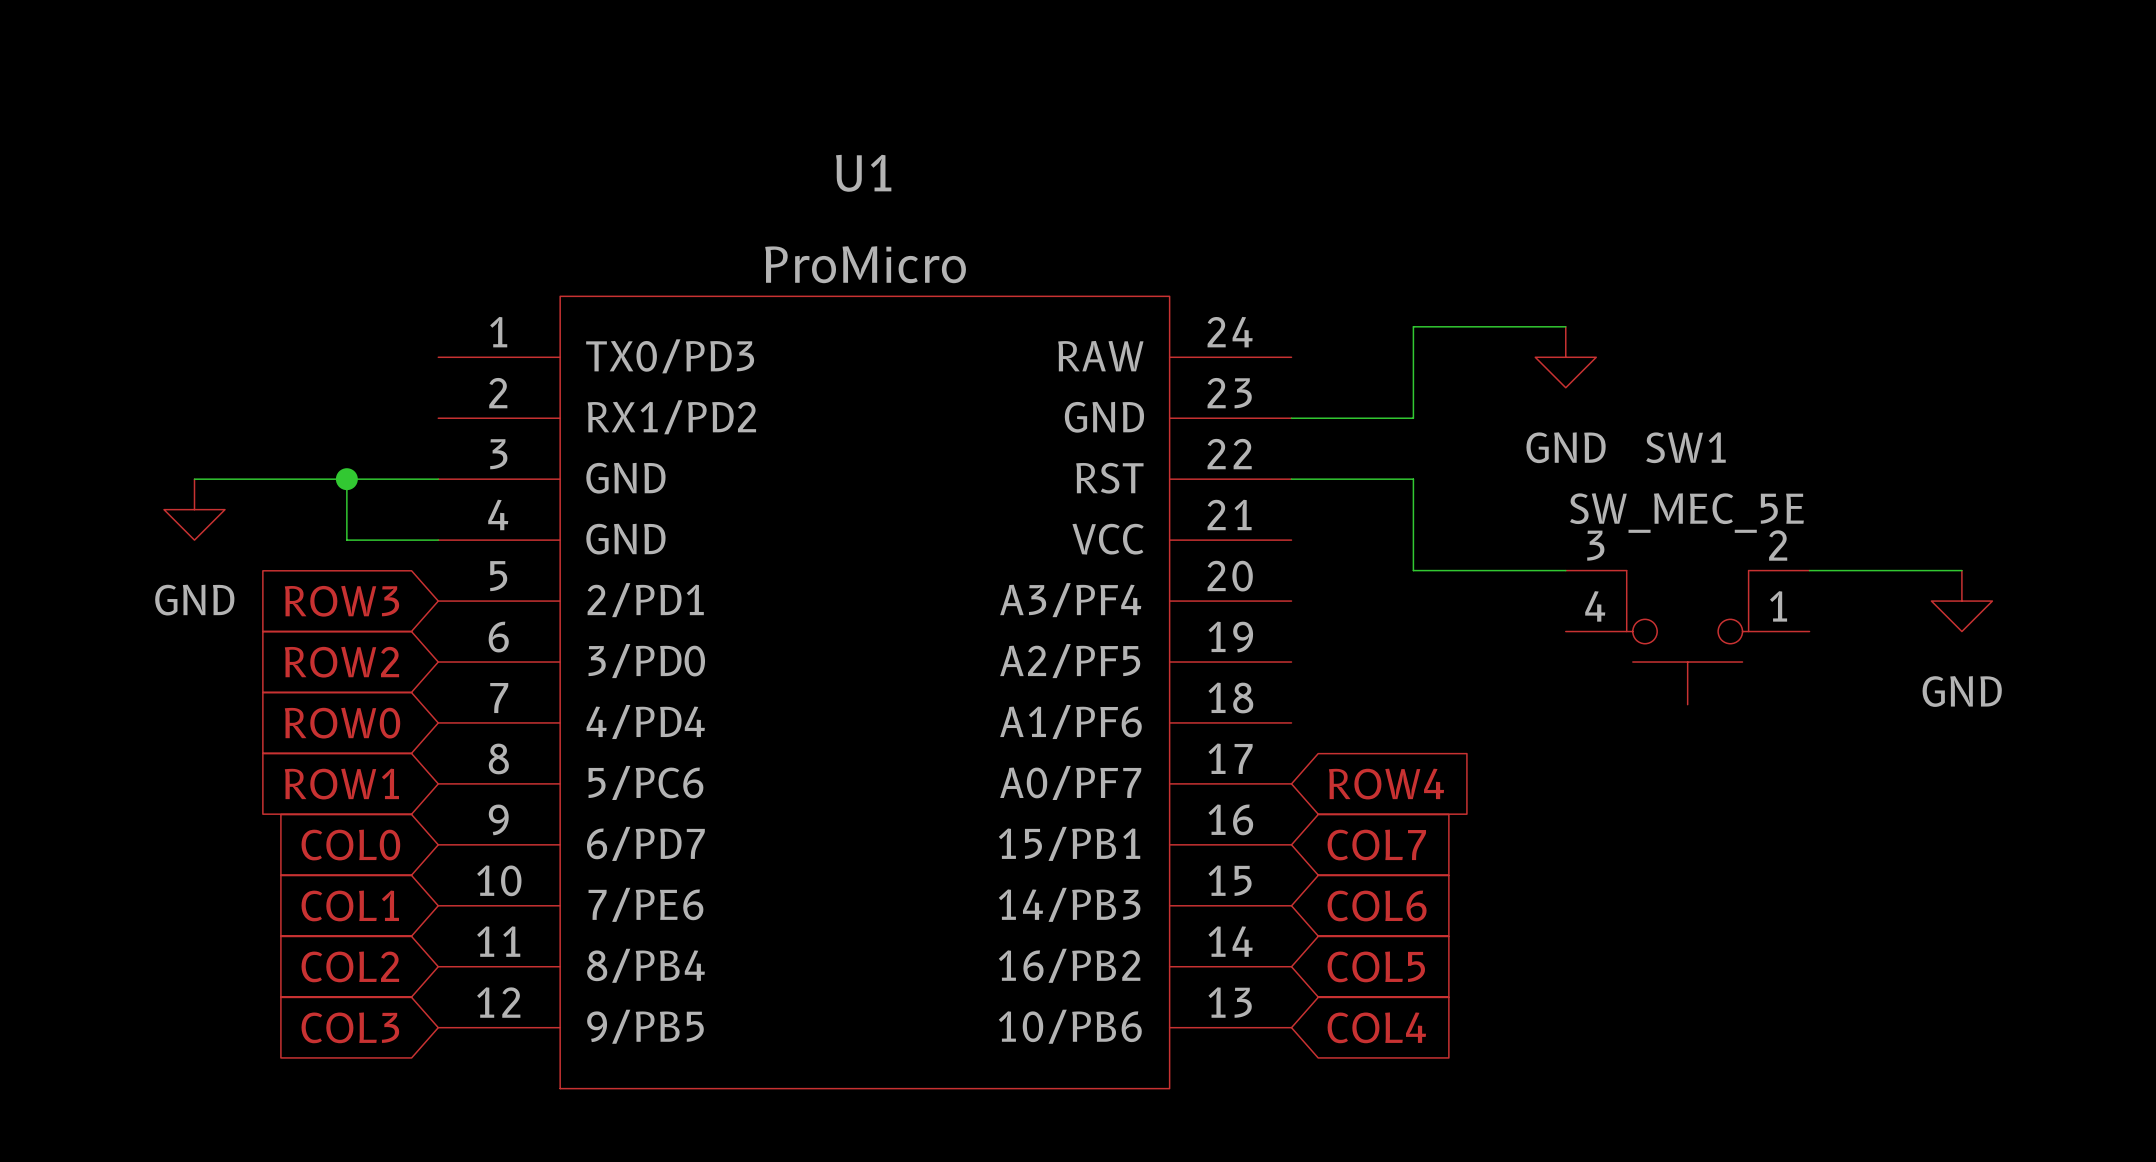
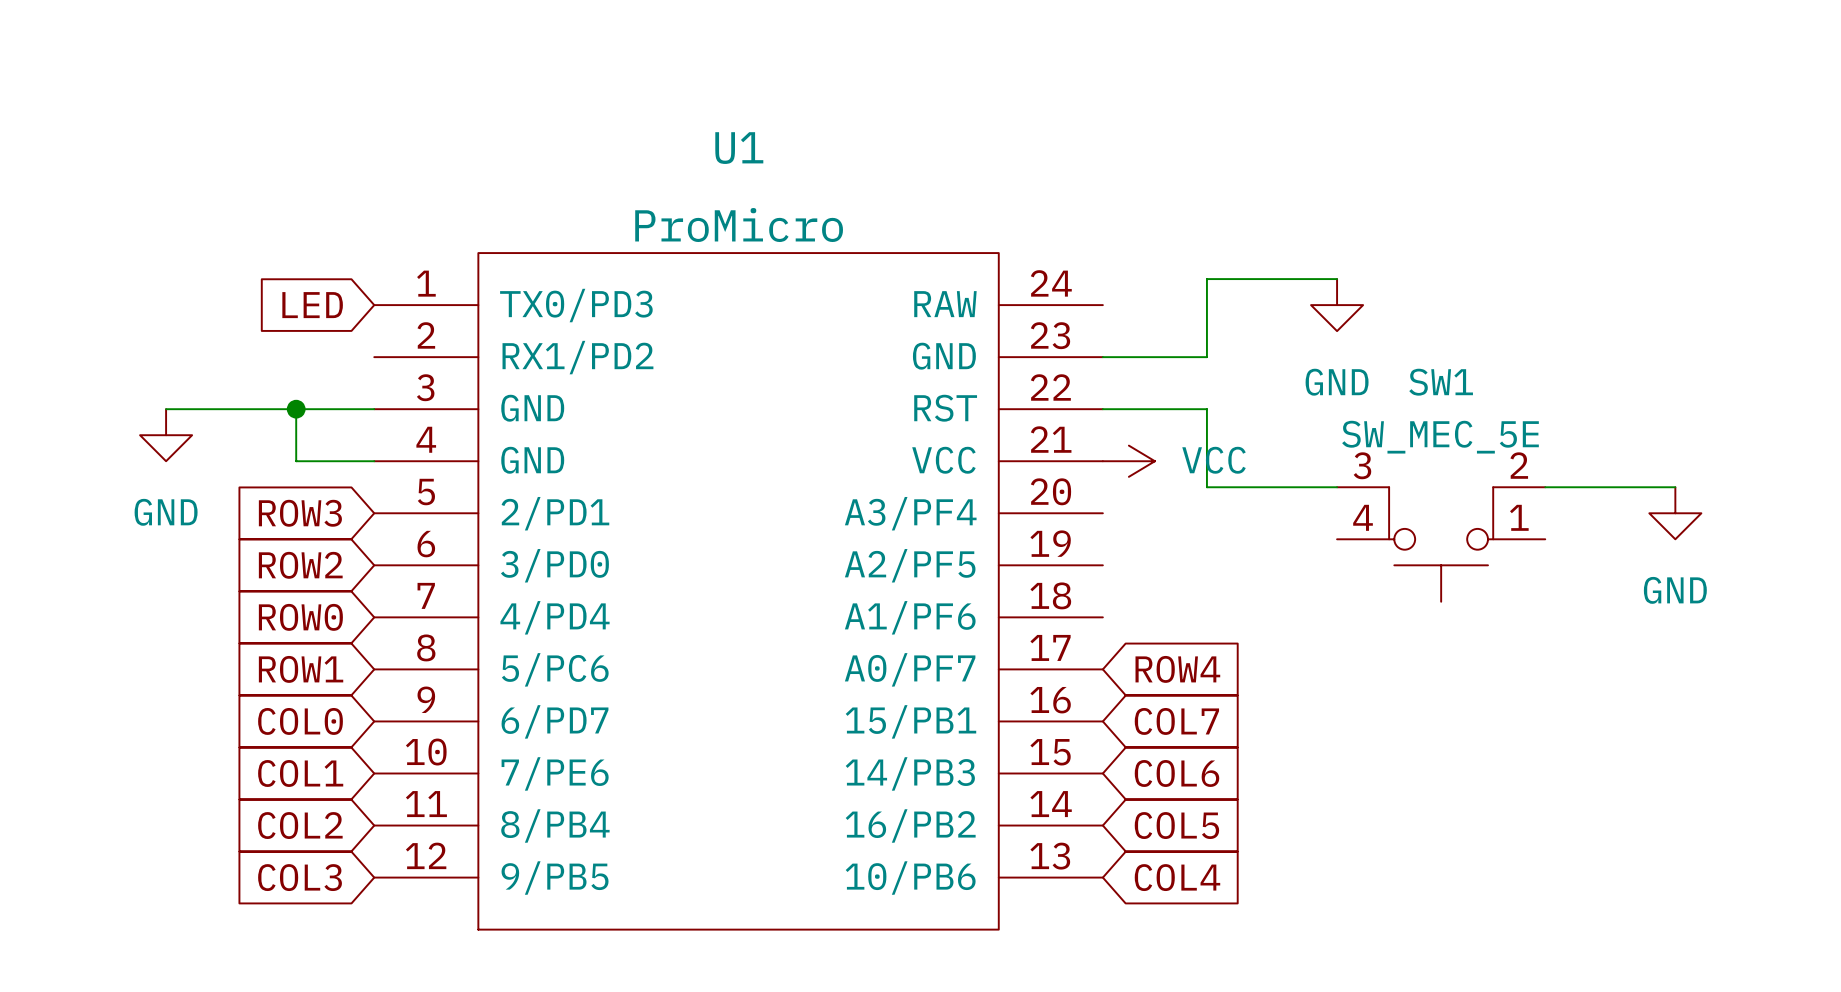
global label: none -> LED (312, 305)
power symbol: none -> VCC (1128, 461)

